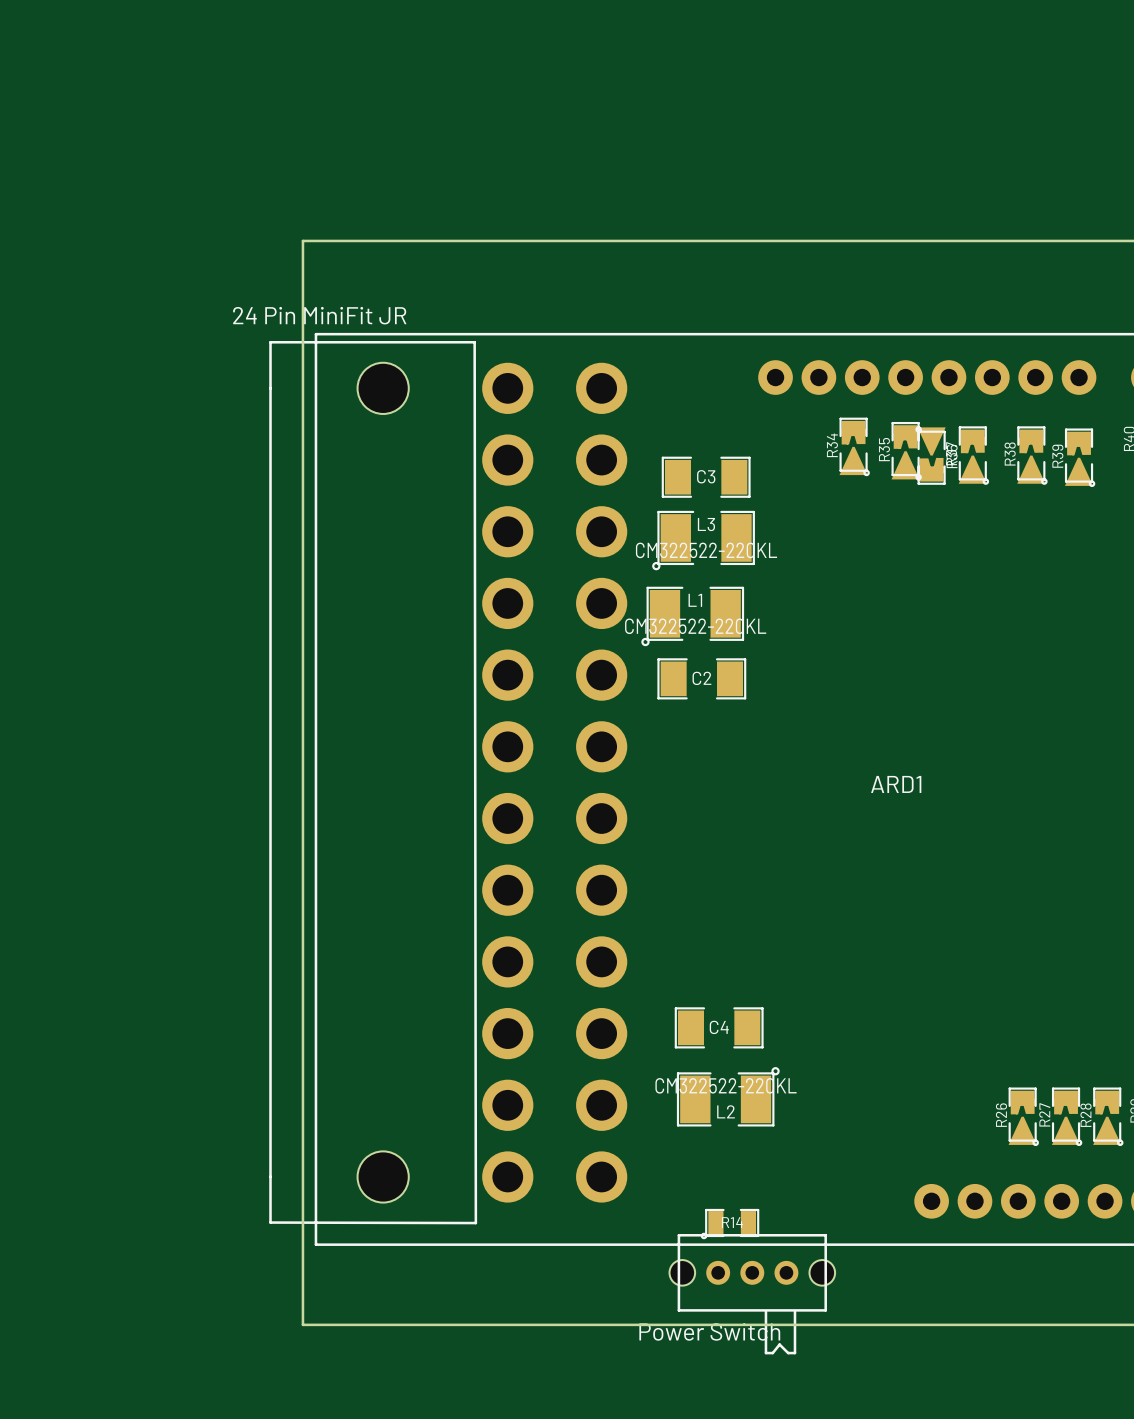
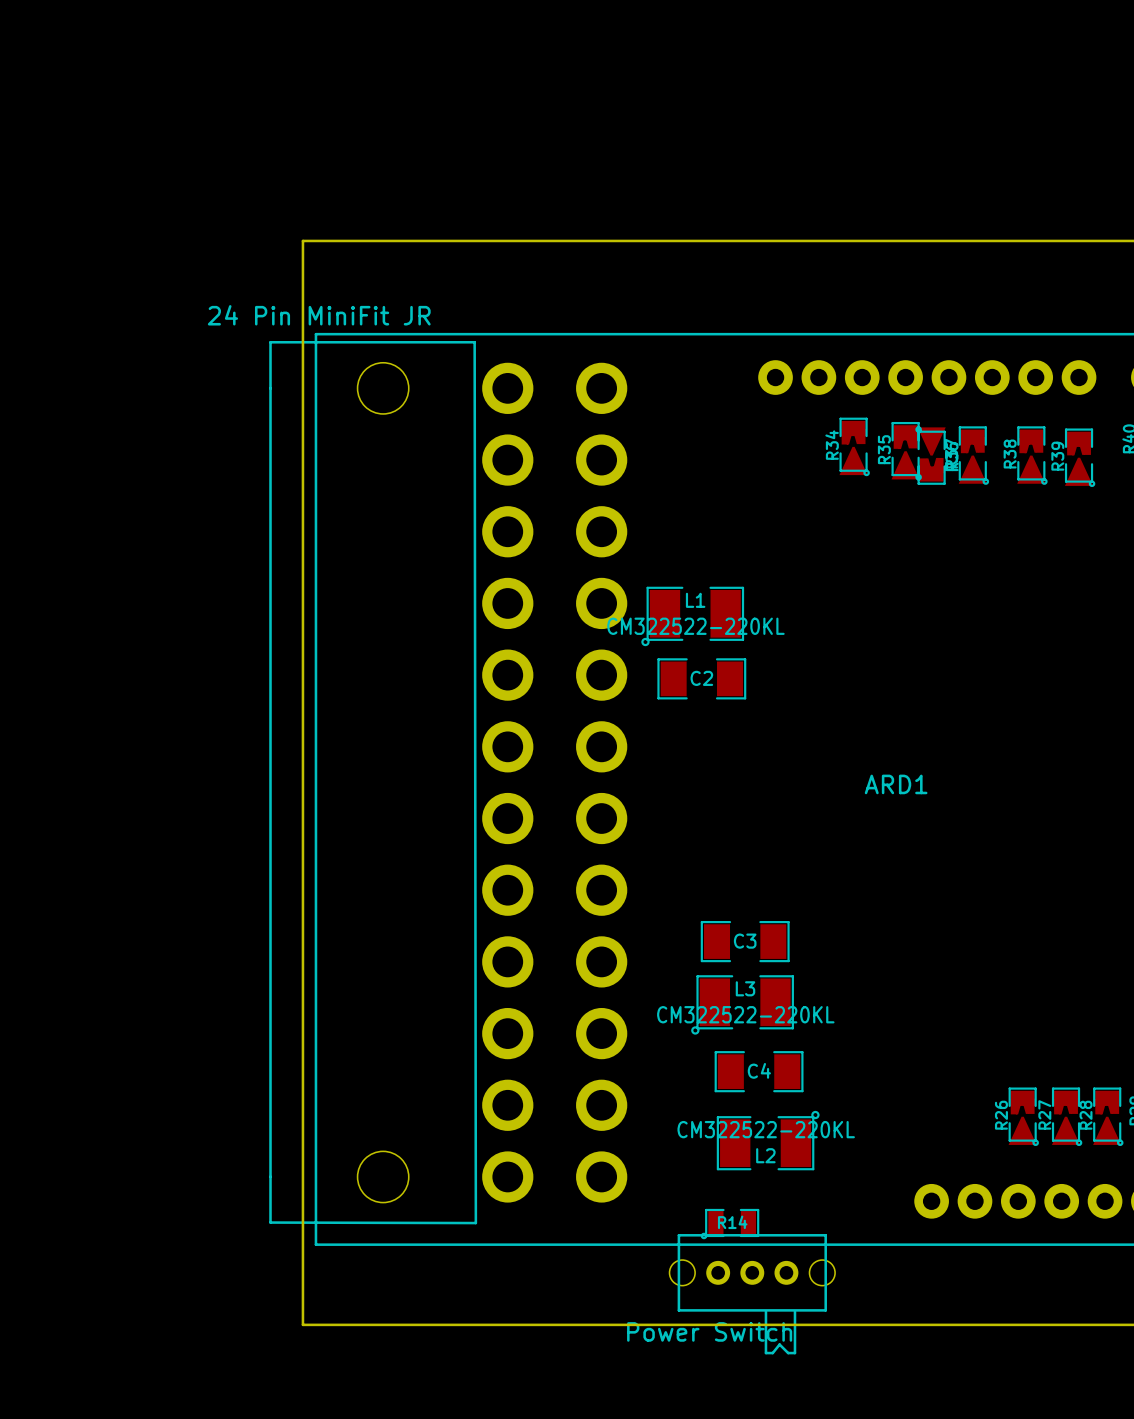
C3 position: (706, 477) -> (745, 941)
L3 position: (703, 540) -> (742, 1004)
C4 position: (719, 1027) -> (759, 1071)
L2 position: (728, 1096) -> (768, 1140)

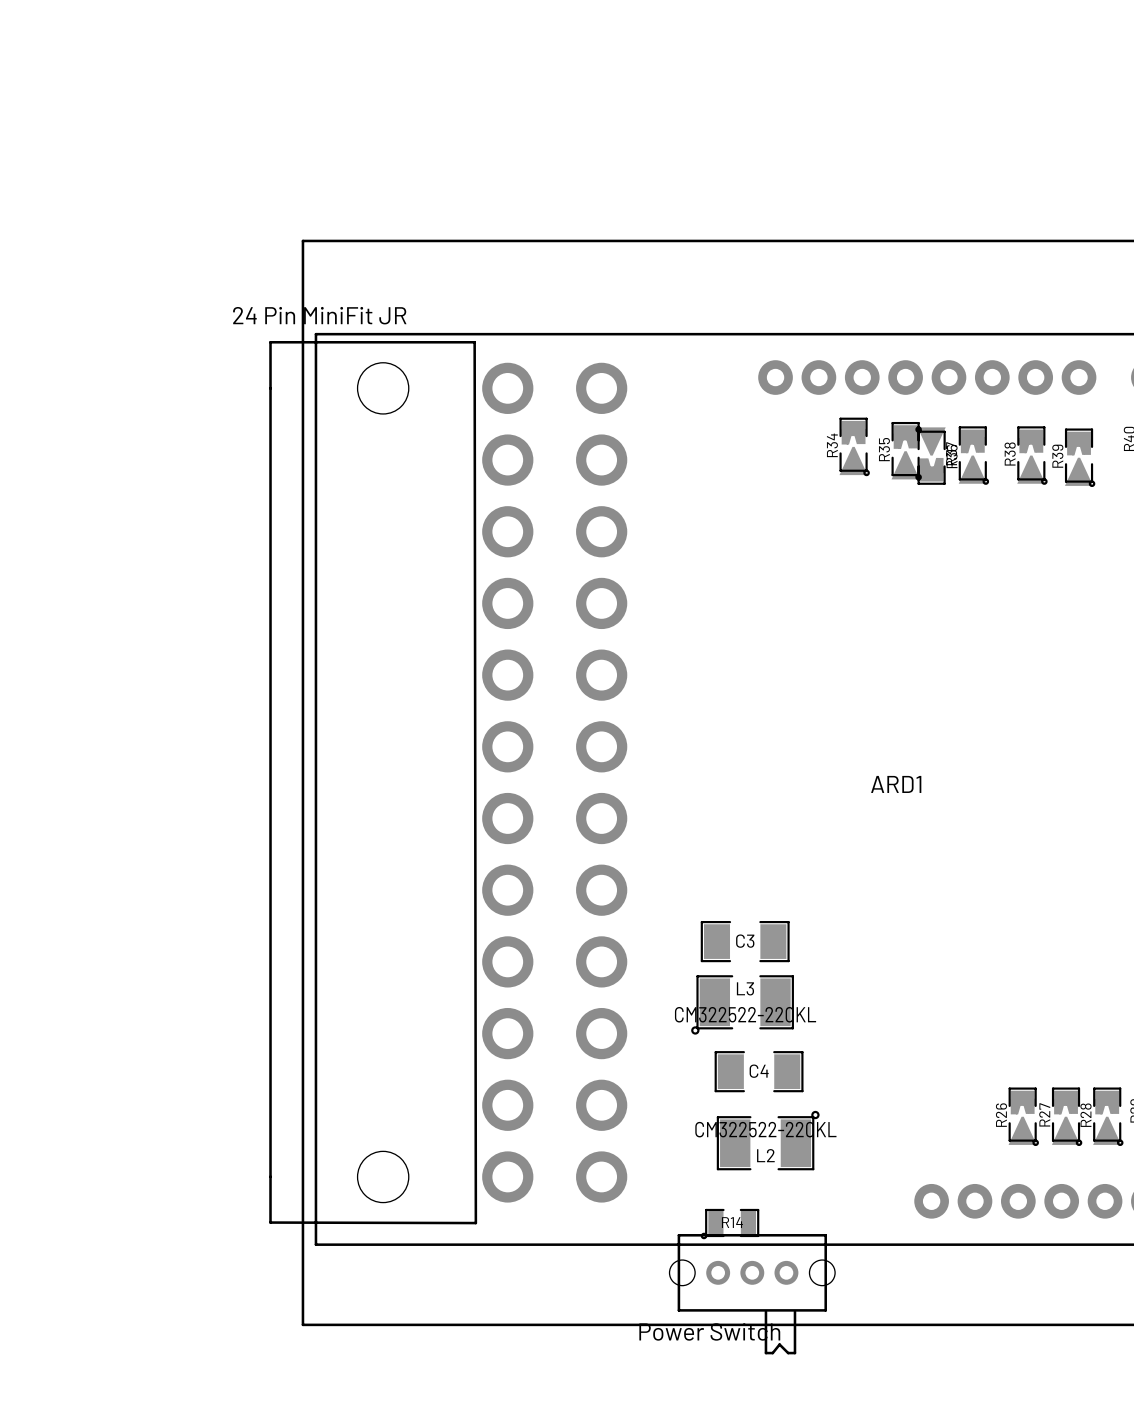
L1: CM322522-220KL (692, 616) -> none
C2: (701, 678) -> none

